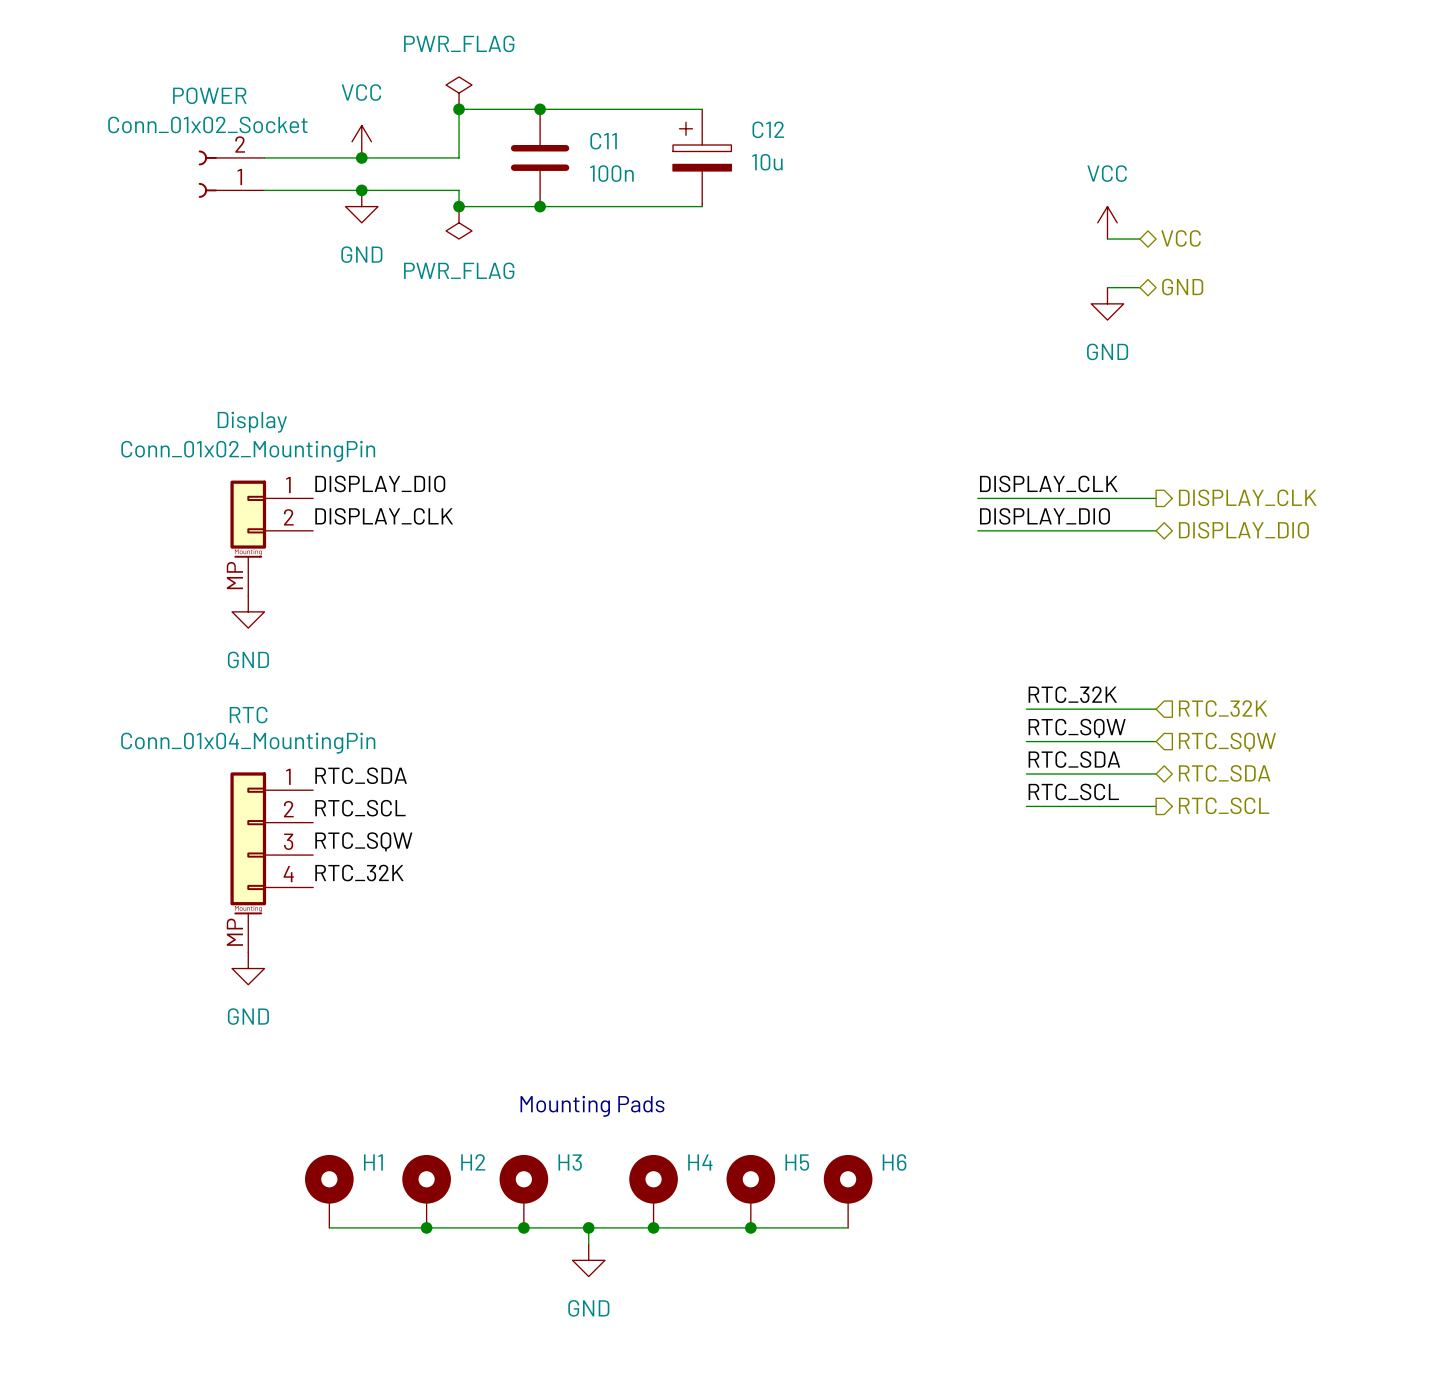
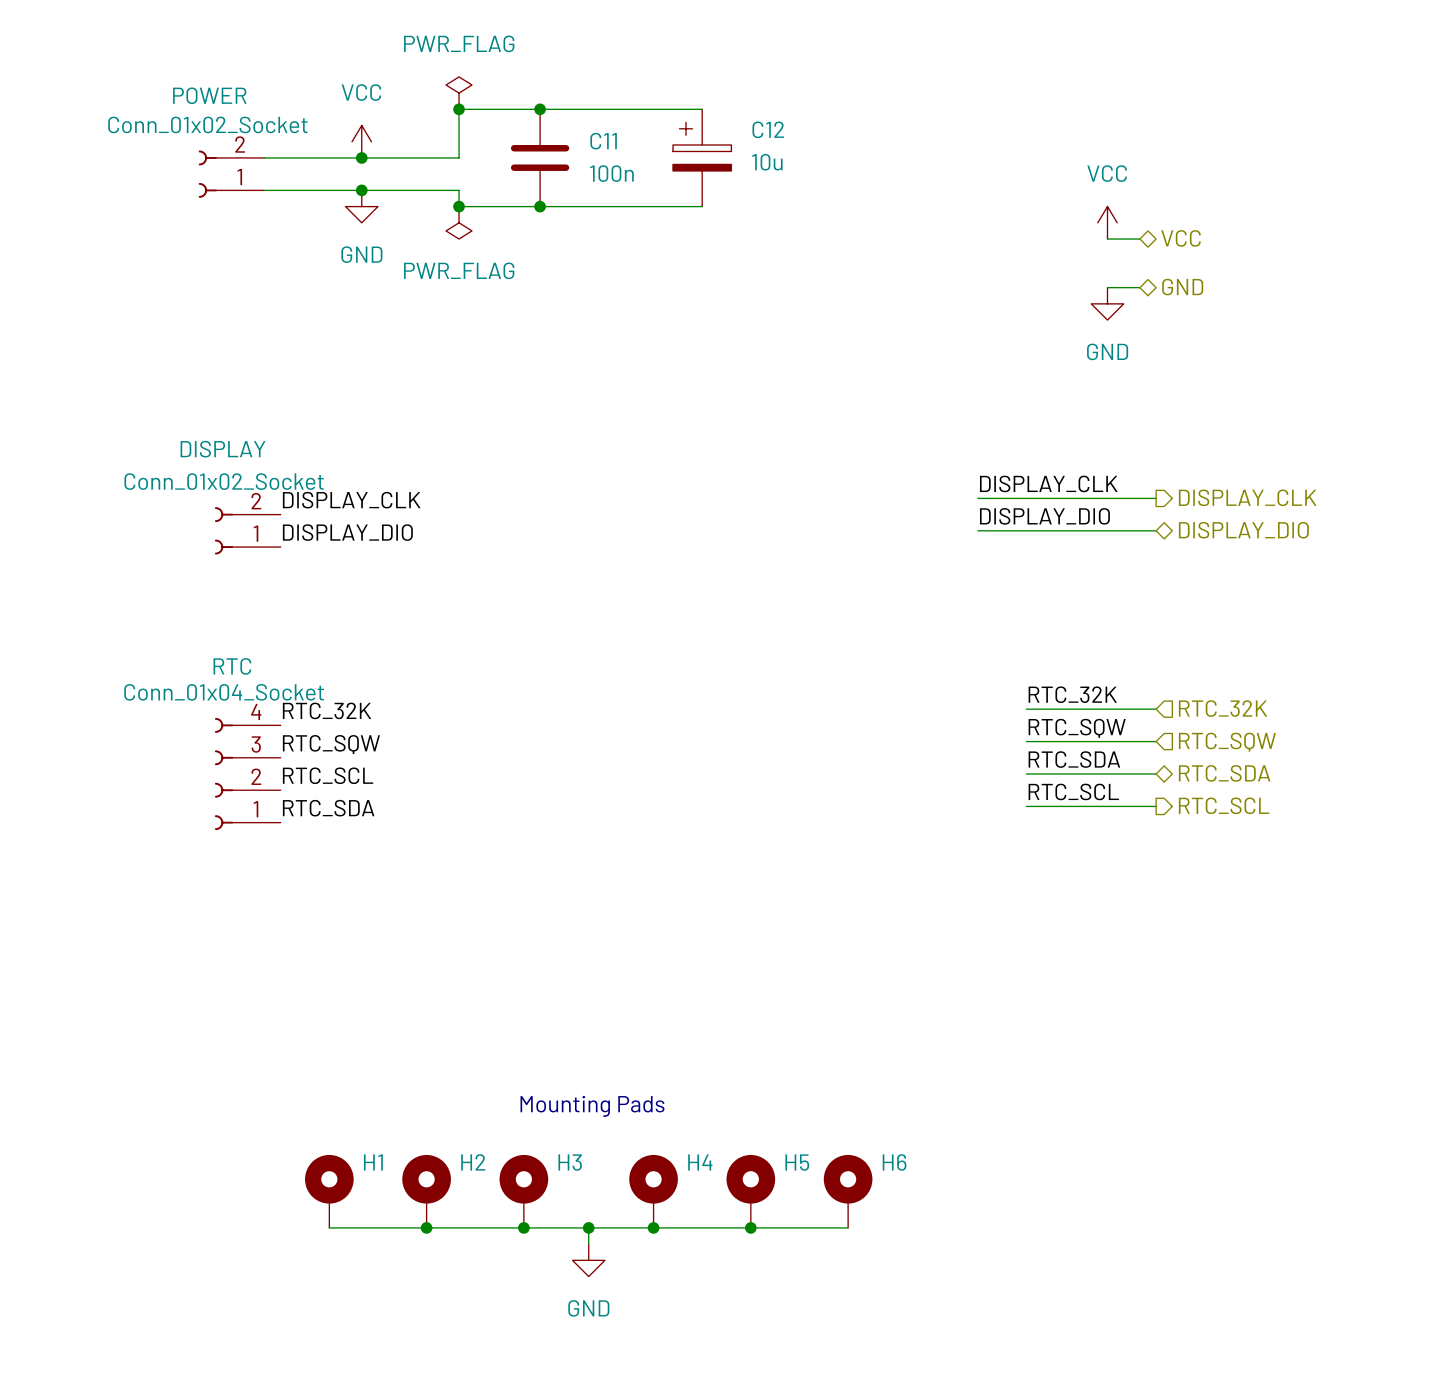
label position: DISPLAY_DIO (380, 483) -> DISPLAY_DIO (347, 532)
label position: DISPLAY_CLK (384, 516) -> DISPLAY_CLK (351, 500)
part: none -> Conn_01x02_Socket (247, 530)
part: Conn_01x02_MountingPin (271, 538) -> none
power symbol: GND (248, 611) -> none
part: none -> Conn_01x04_Socket (247, 774)
label position: RTC_SDA (361, 775) -> RTC_SDA (328, 808)
label position: RTC_SCL (360, 808) -> RTC_SCL (328, 775)
label position: RTC_SQW (363, 841) -> RTC_SQW (331, 744)
part: Conn_01x04_MountingPin (271, 862) -> none
label position: RTC_32K (359, 873) -> RTC_32K (327, 710)
power symbol: GND (248, 968) -> none

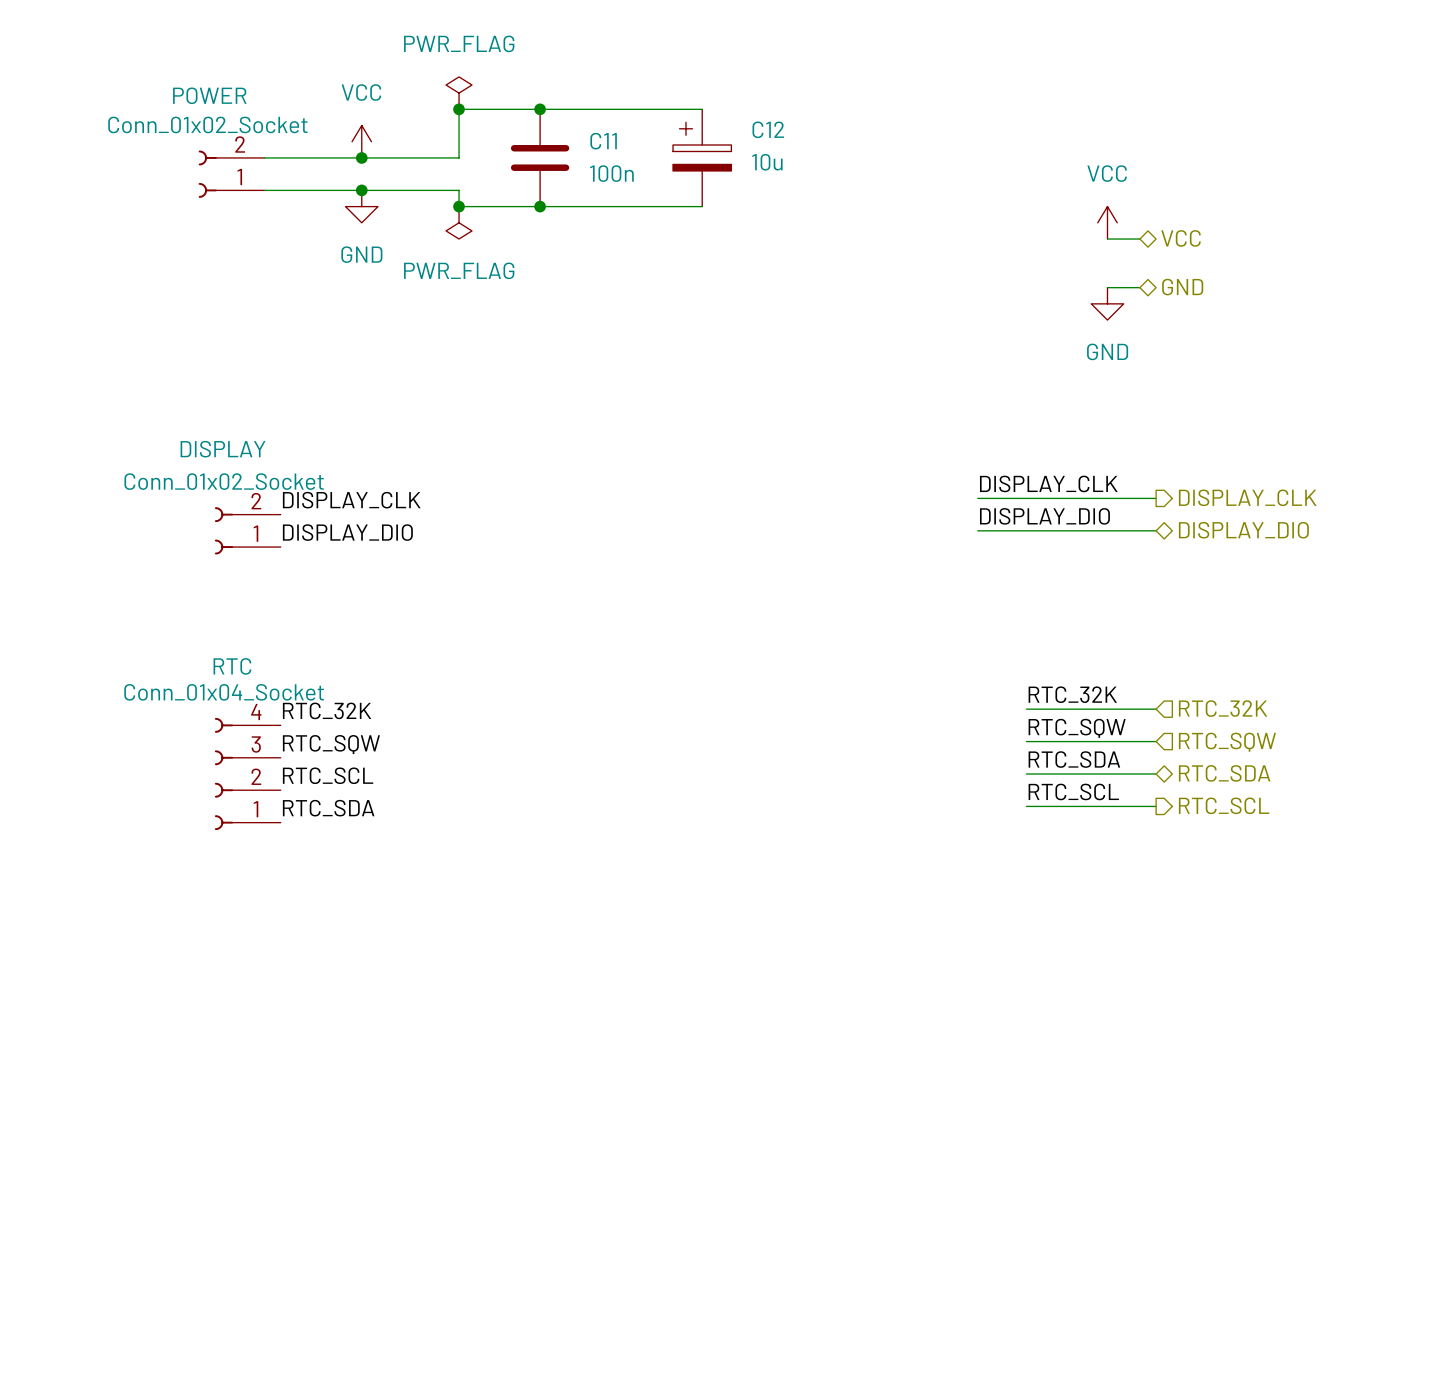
text: Mounting Pads (592, 1106) -> none
H1: (329, 1191) -> none
H2: (426, 1191) -> none
H3: (523, 1191) -> none
H4: (653, 1191) -> none
H5: (750, 1191) -> none
H6: (848, 1191) -> none
wire: (329, 1227) (848, 1227) -> none
junction: (426, 1227) -> none
junction: (523, 1227) -> none
wire: (588, 1227) (588, 1244) -> none
junction: (588, 1227) -> none
junction: (653, 1227) -> none
junction: (750, 1227) -> none
power symbol: GND (588, 1260) -> none

